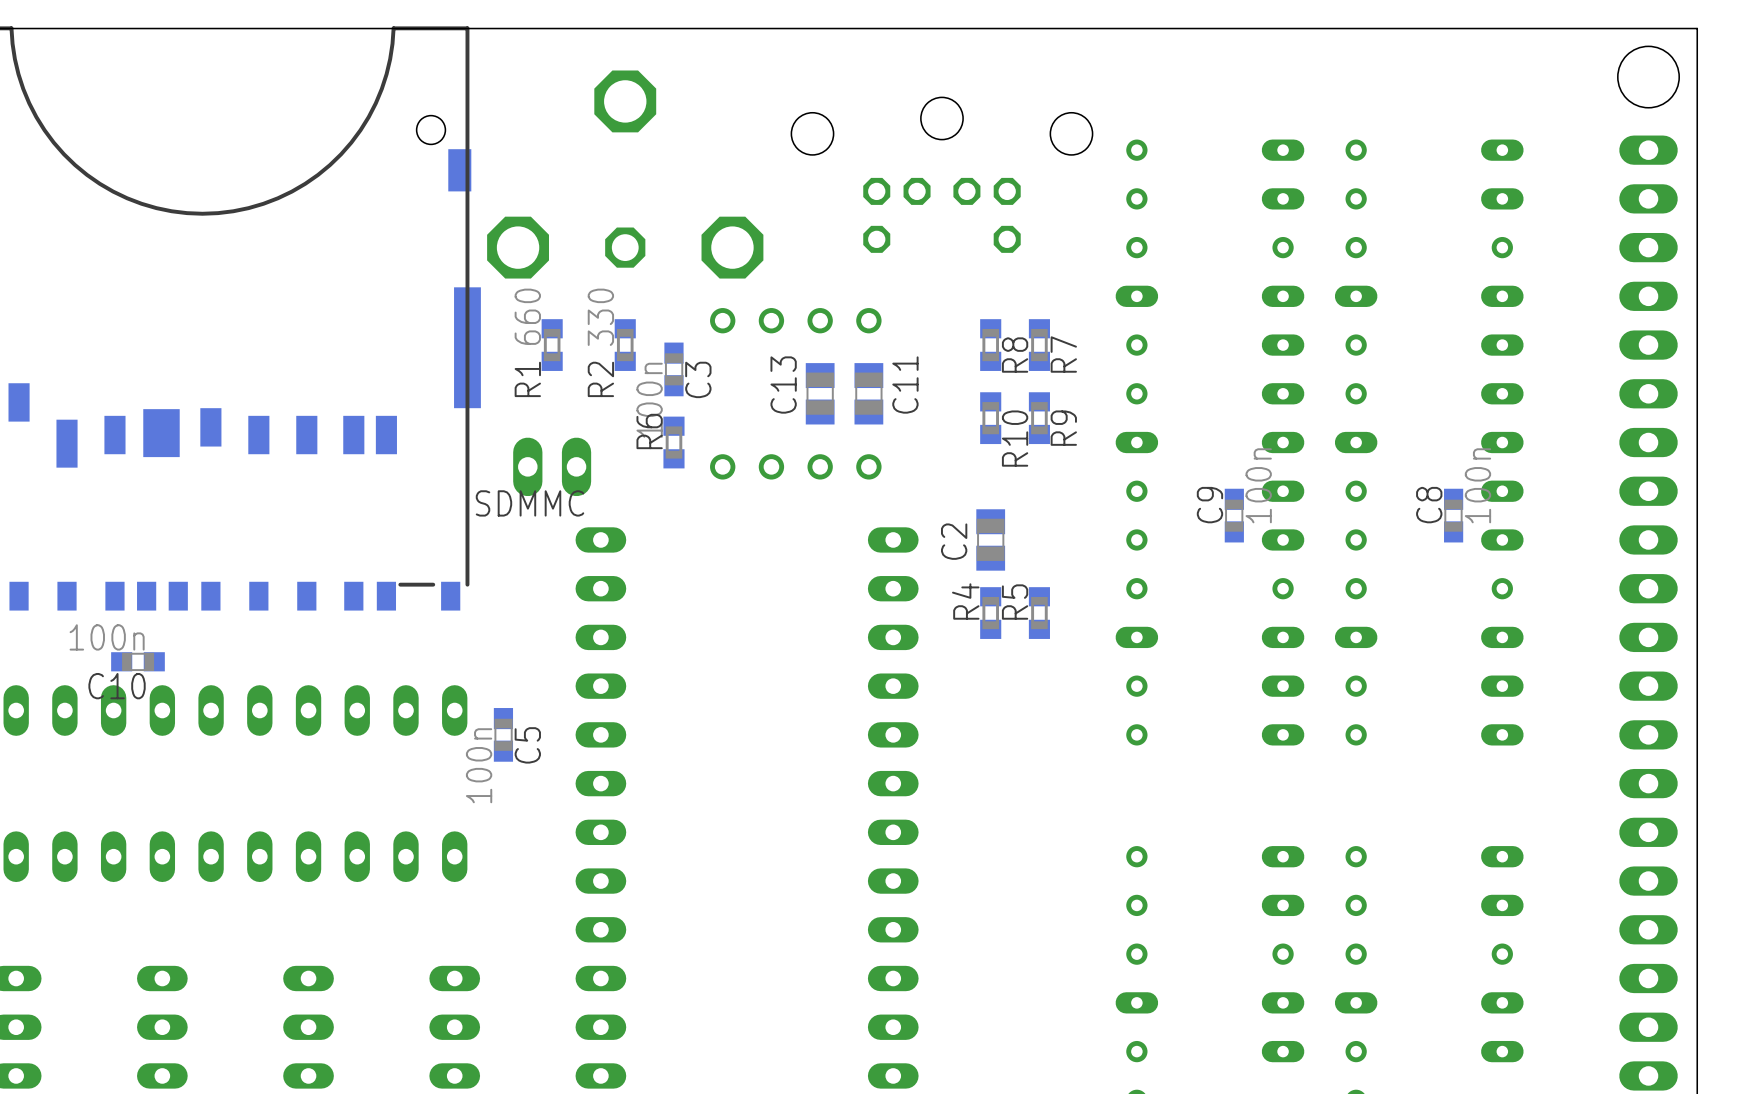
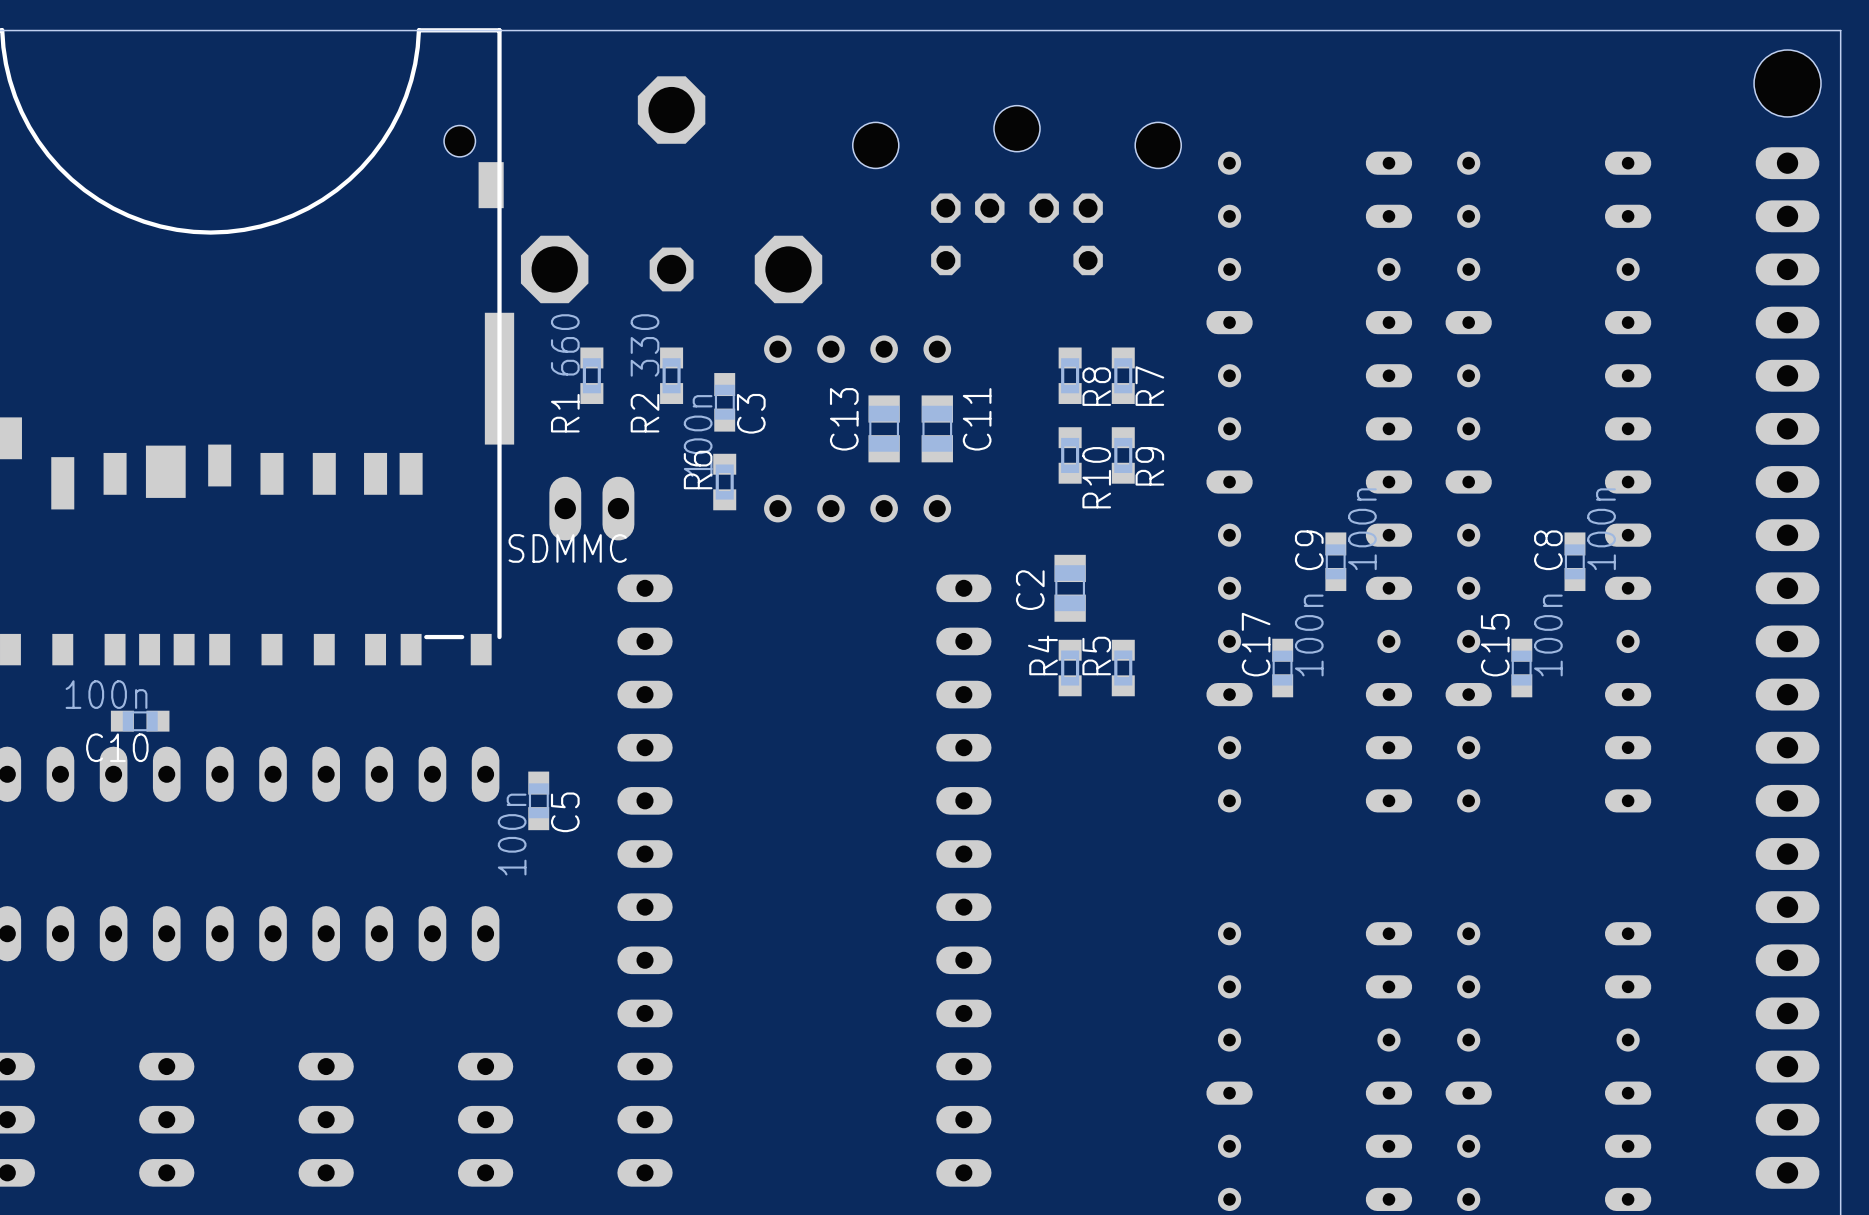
C17: none -> 100n (1282, 668)
C15: none -> 100n (1521, 668)

